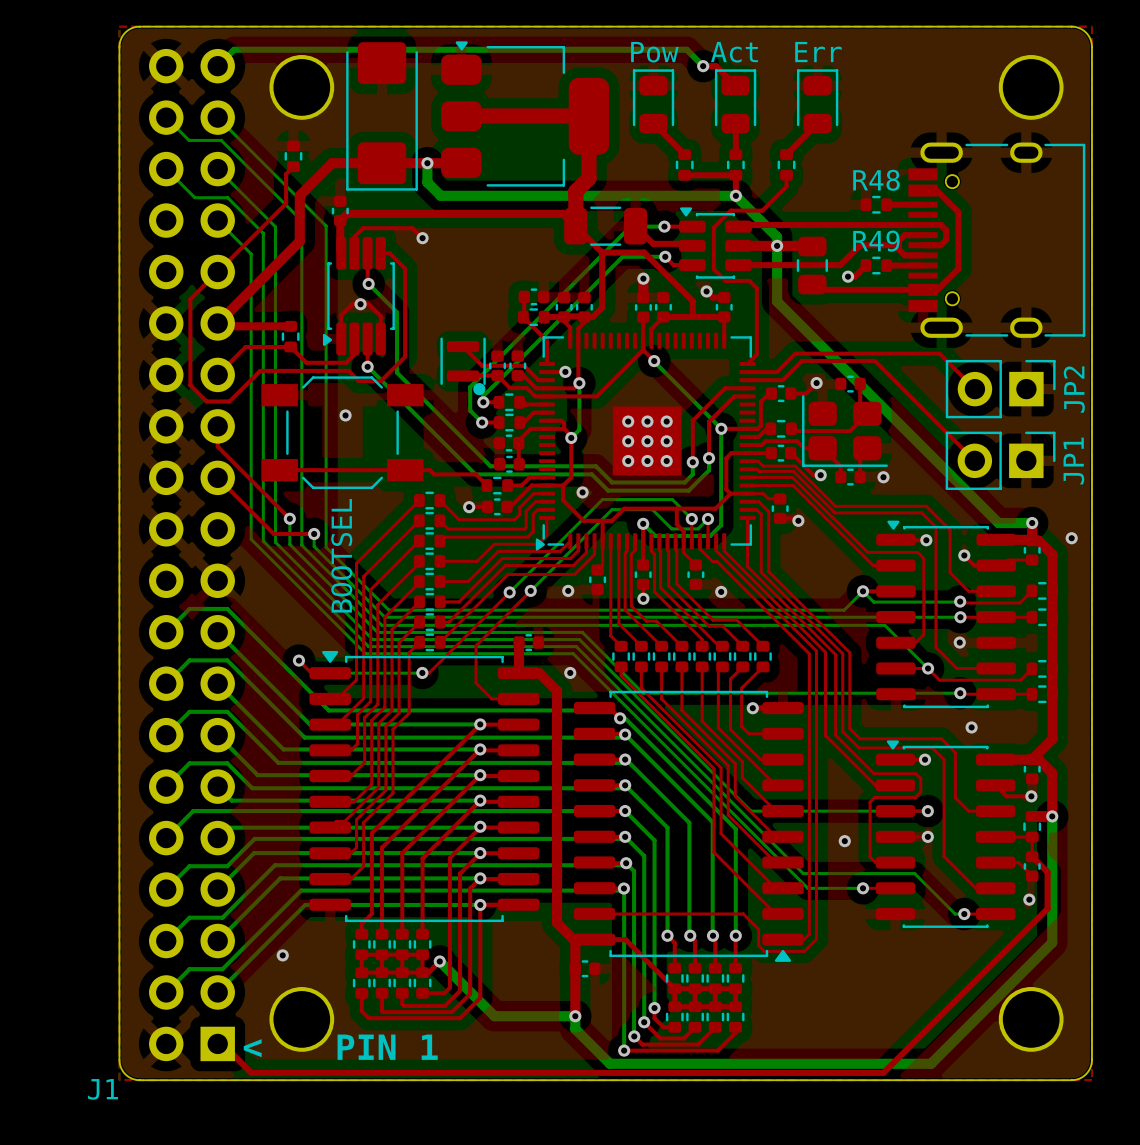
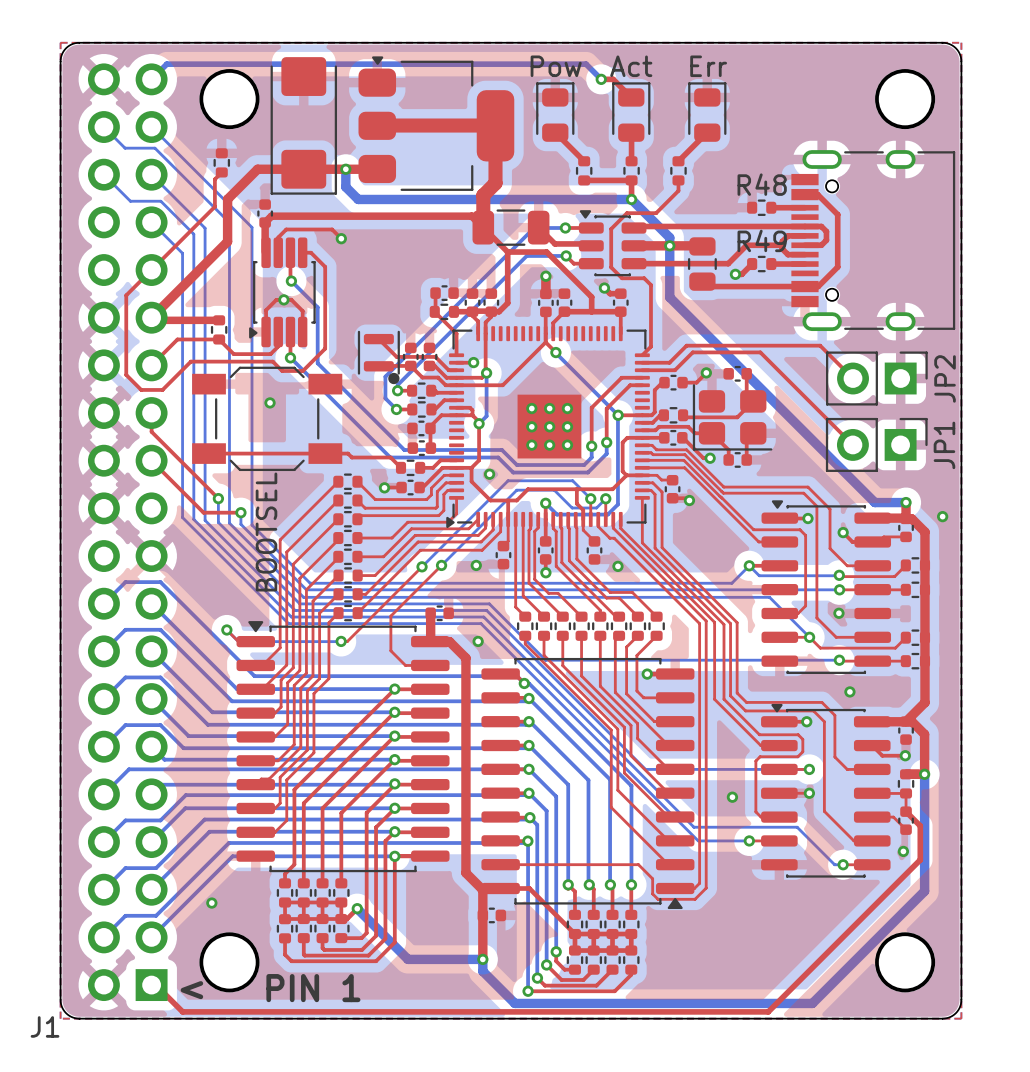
via: (883, 477) -> none

